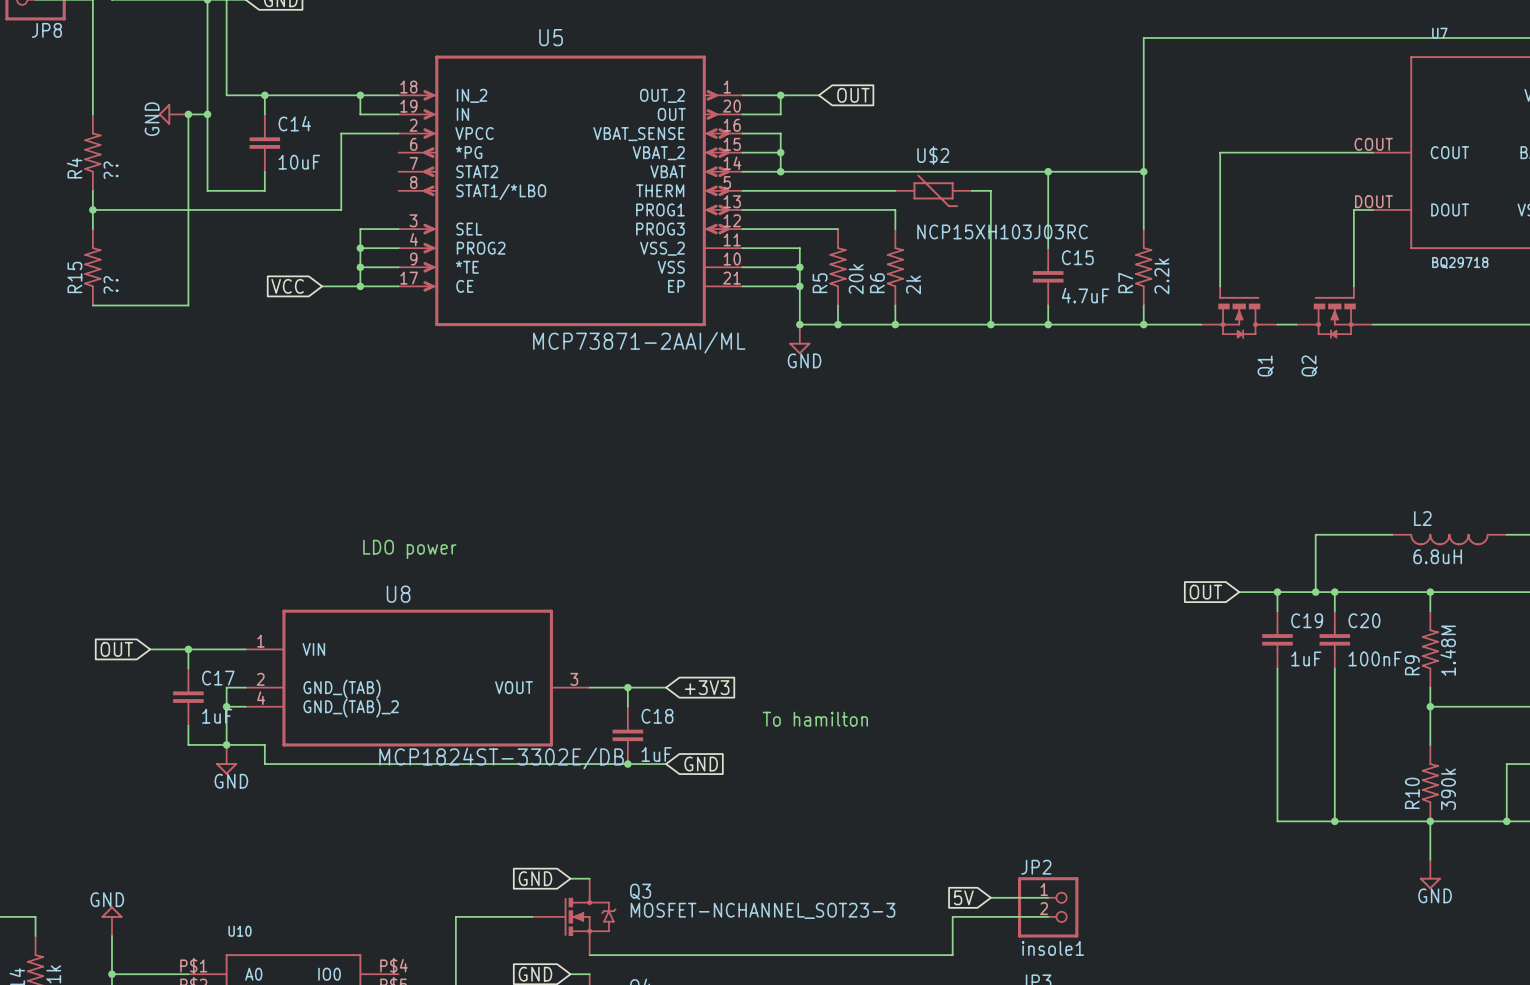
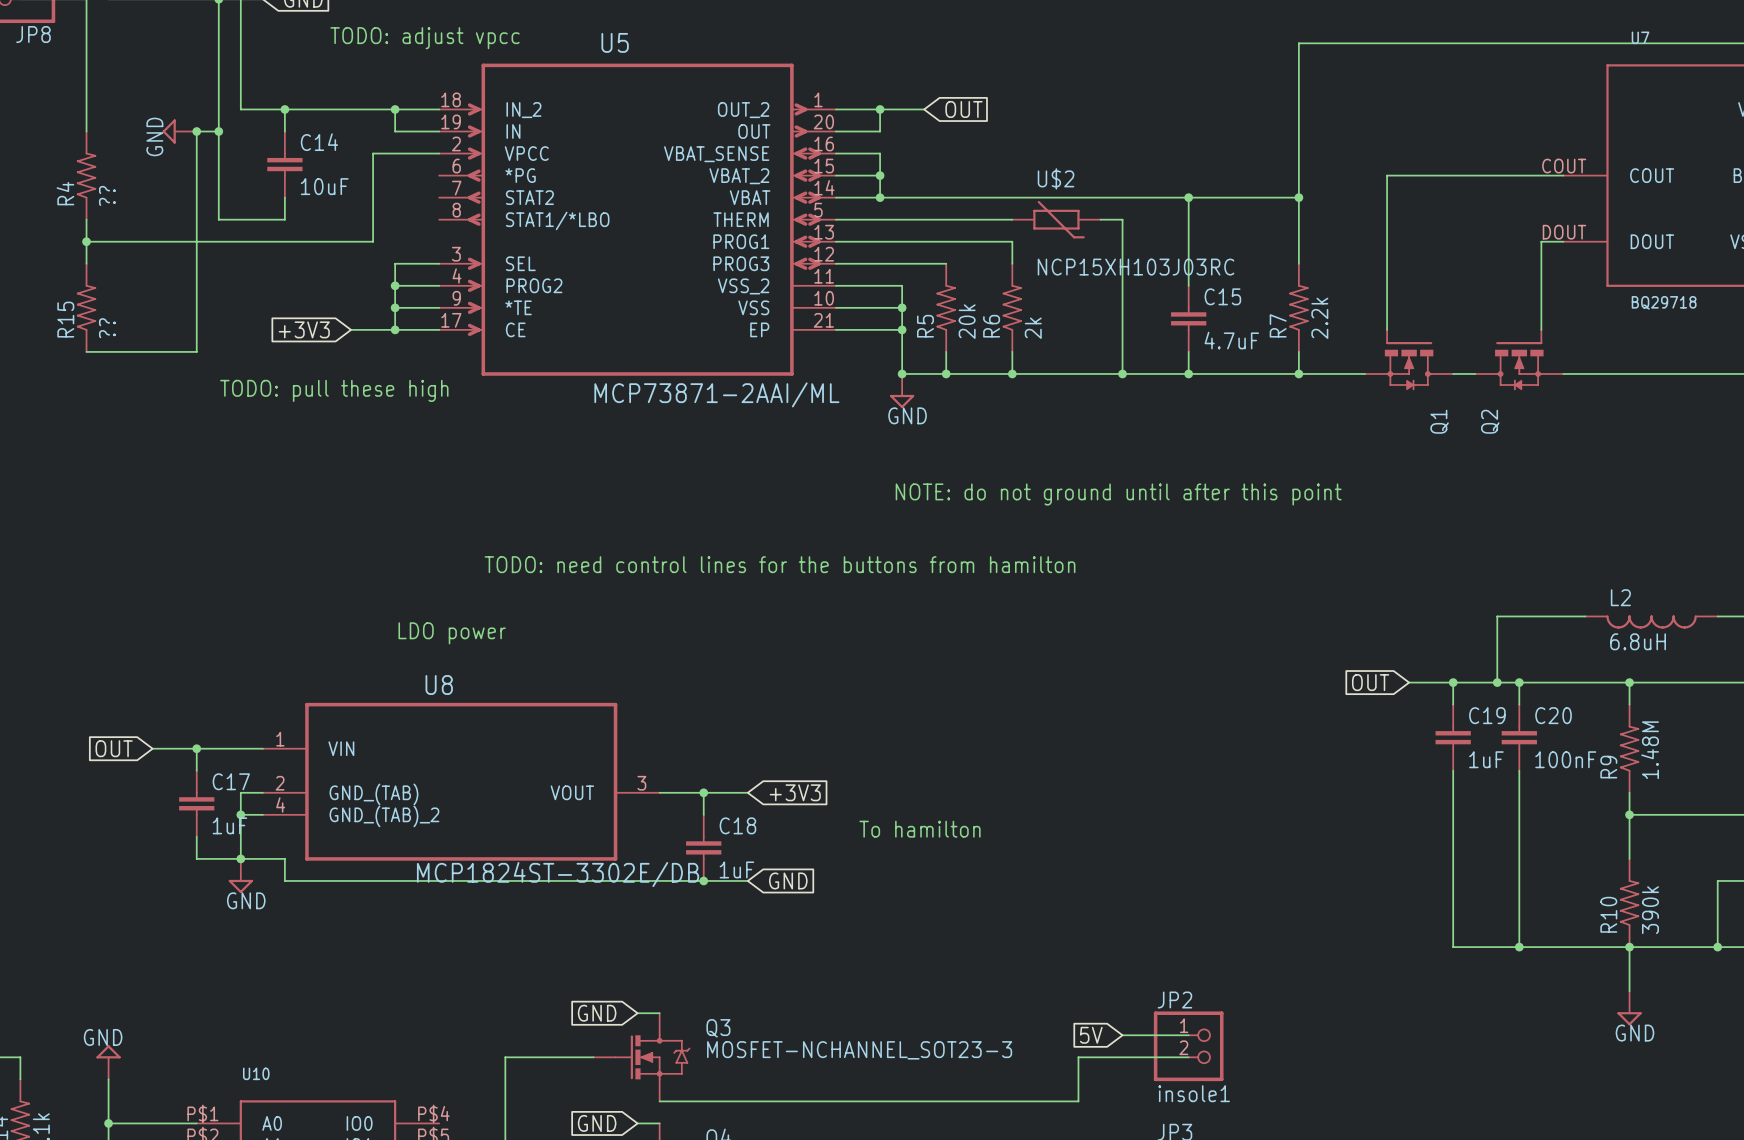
text: none -> TODO: adjust vpcc (425, 38)
global label: VCC (287, 286) -> +3V3 (304, 329)
text: none -> TODO: pull these high (334, 390)
text: none -> NOTE: do not ground until after this point (1118, 494)
text: none -> TODO: need control lines for the buttons from hamilton (780, 564)

